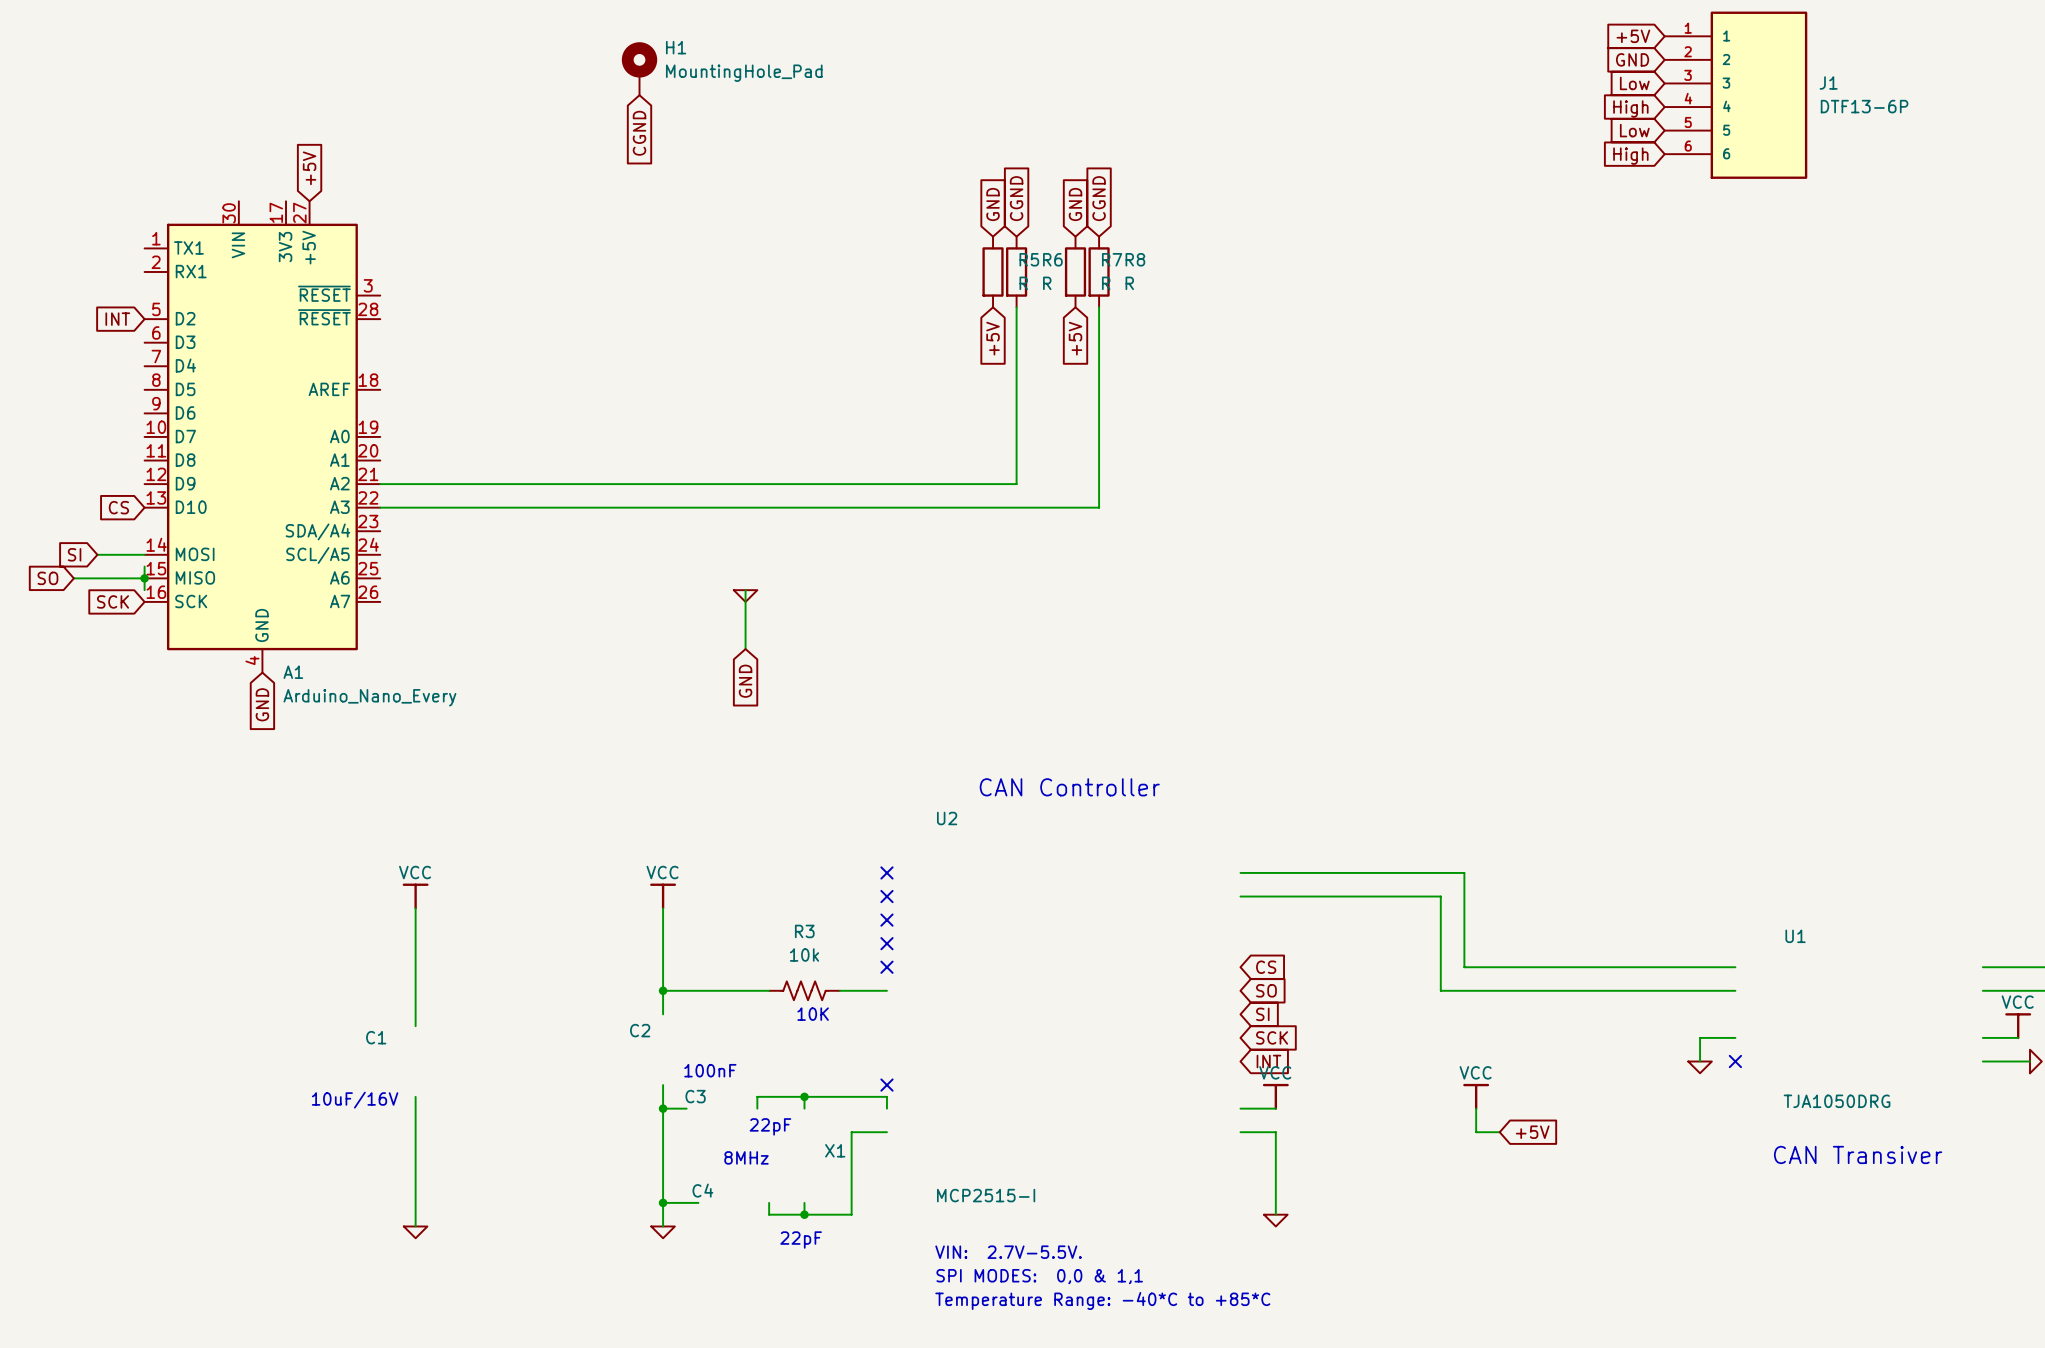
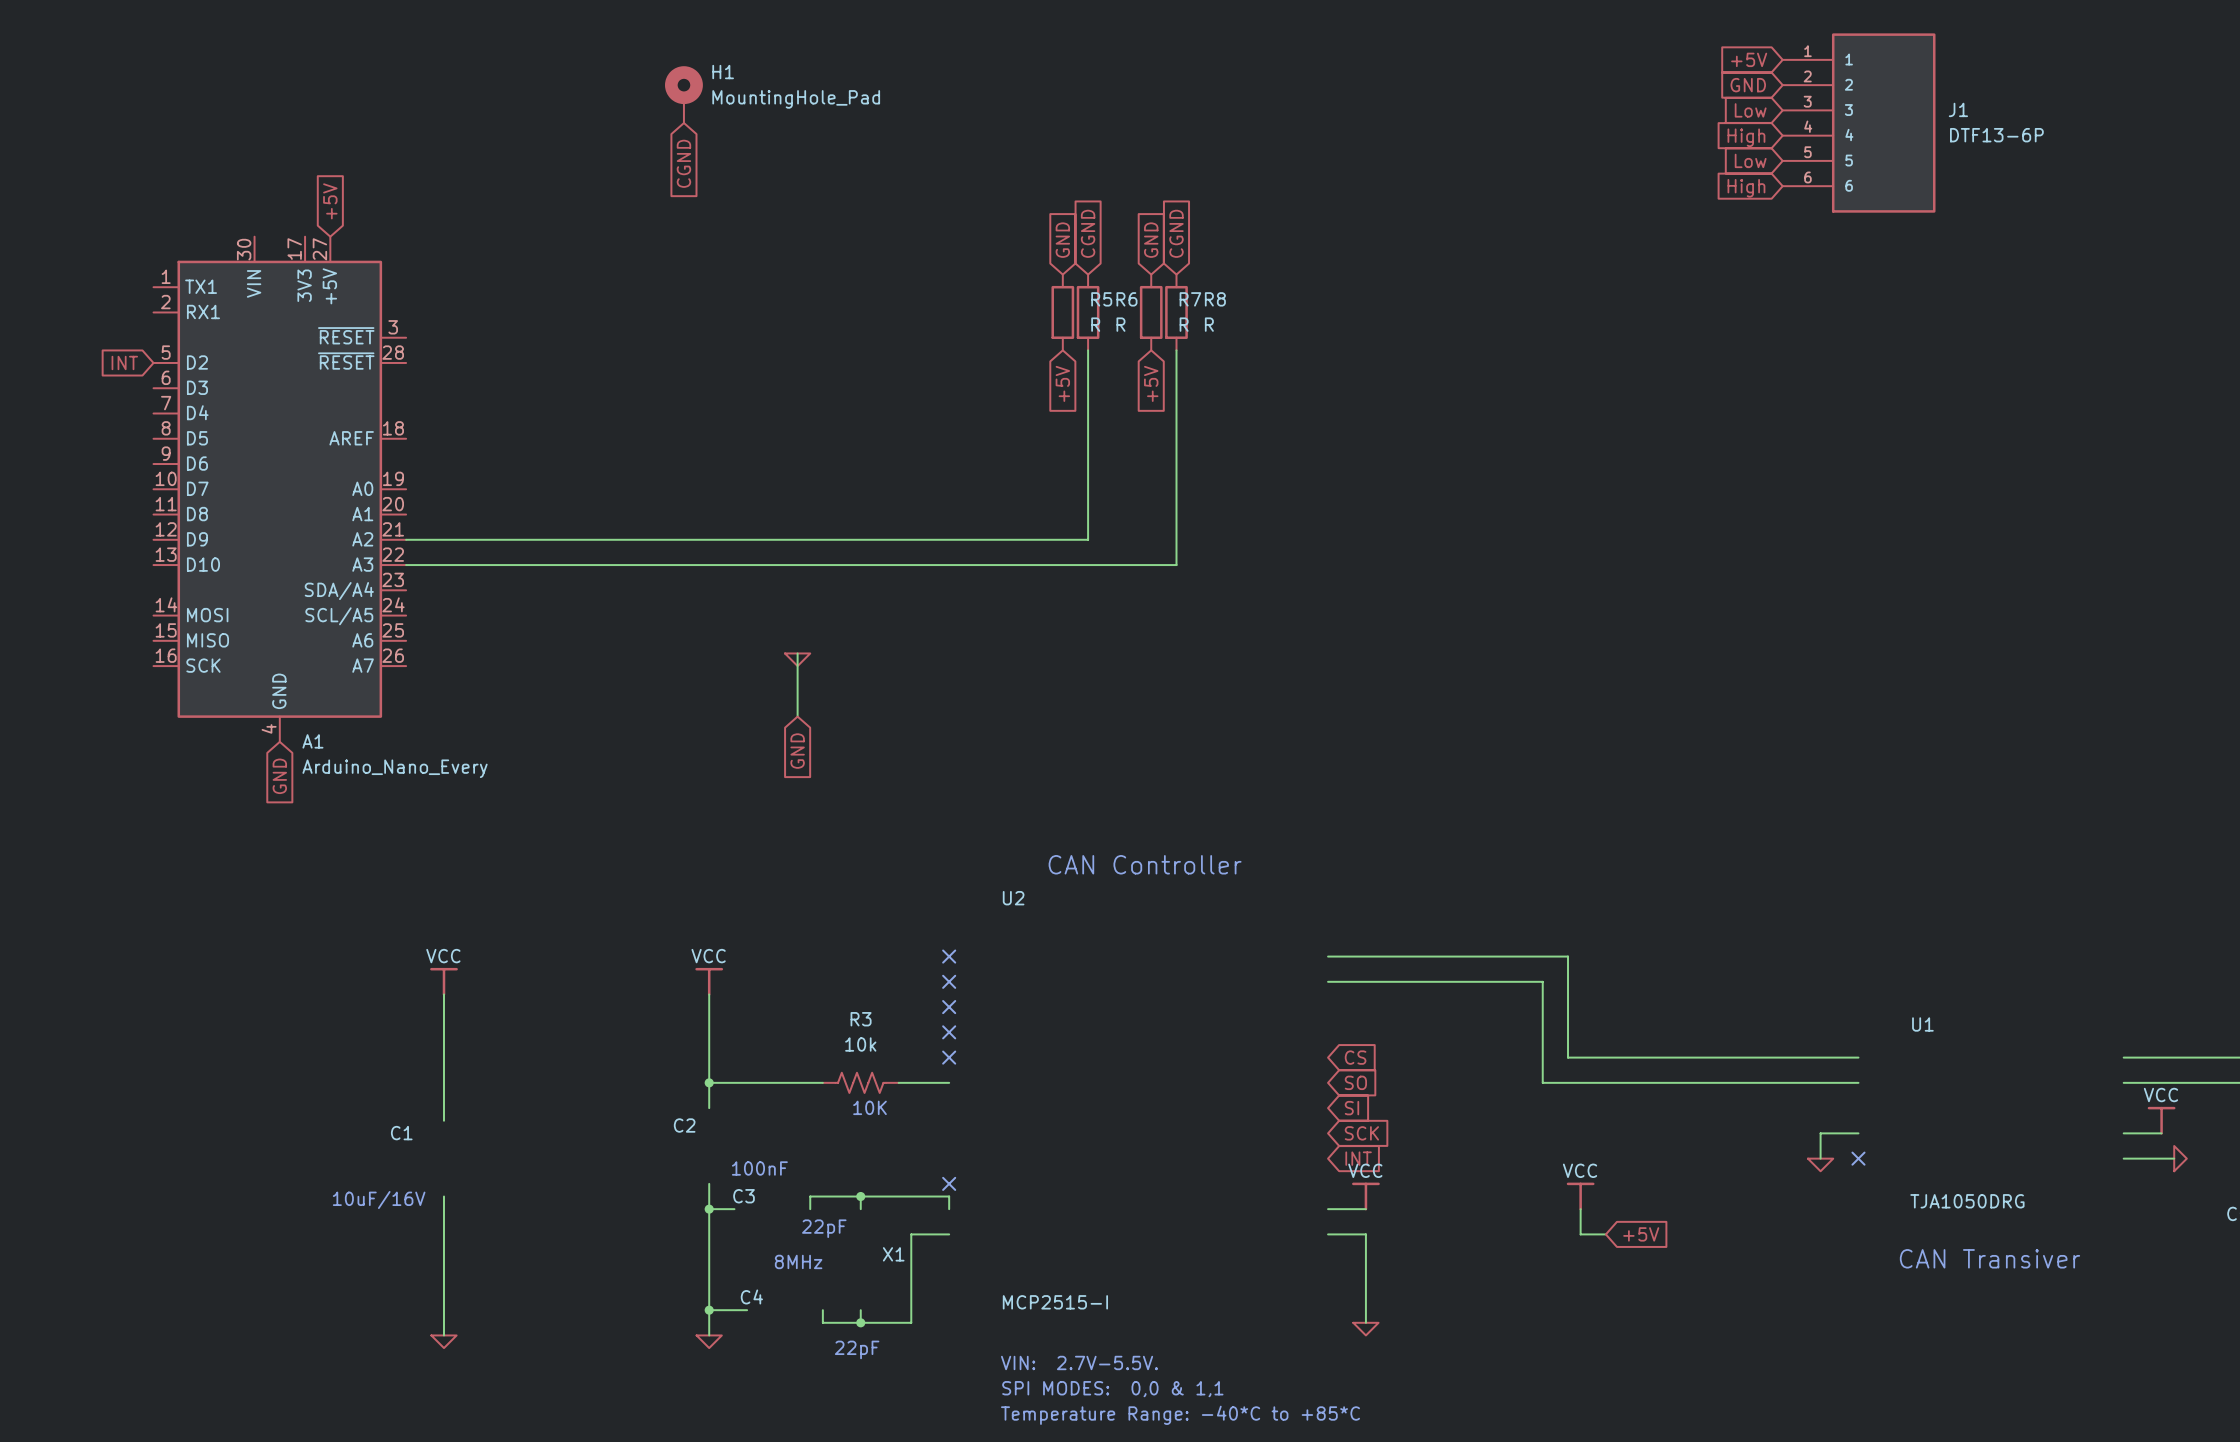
global label: CS (118, 507) -> none
global label: SI (74, 554) -> none
wire: (97, 554) (144, 554) -> none
wire: (144, 566) (144, 590) -> none
global label: SO (47, 578) -> none
wire: (73, 578) (144, 578) -> none
junction: (144, 578) -> none
global label: SCK (113, 601) -> none

